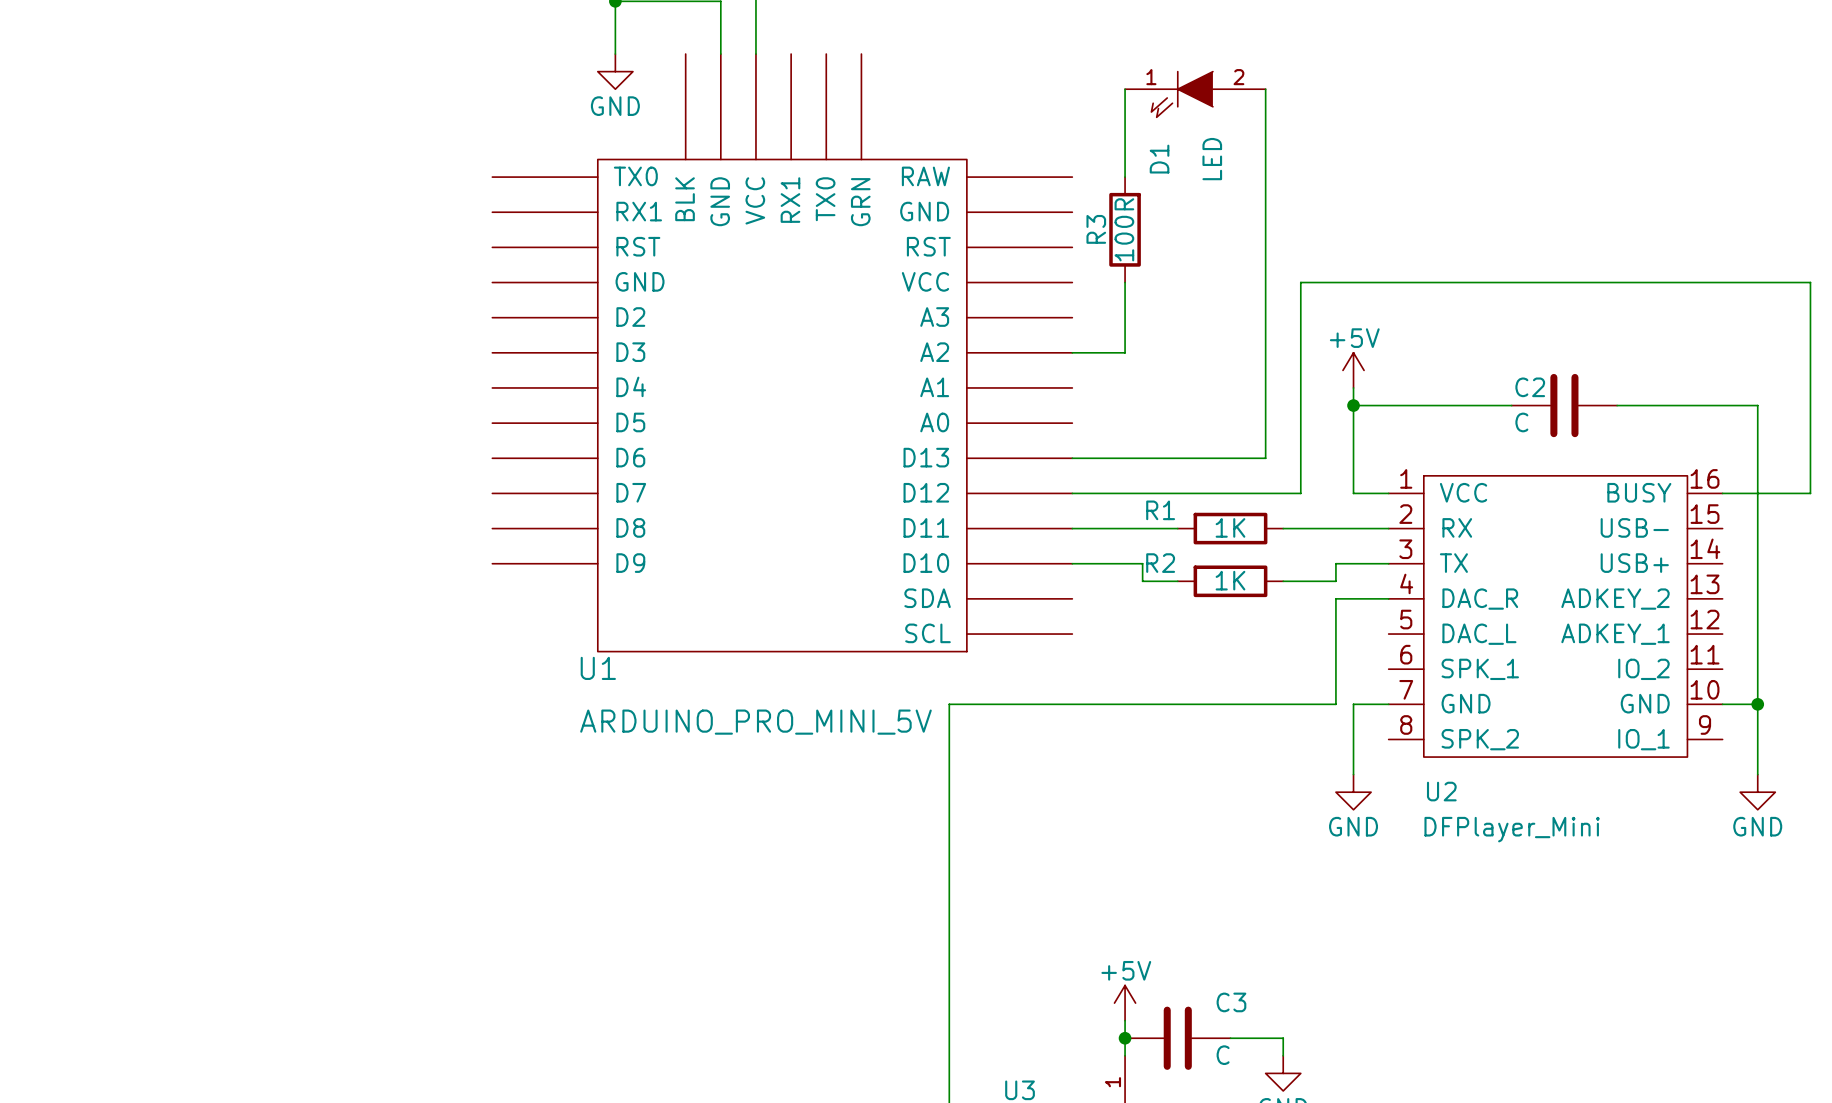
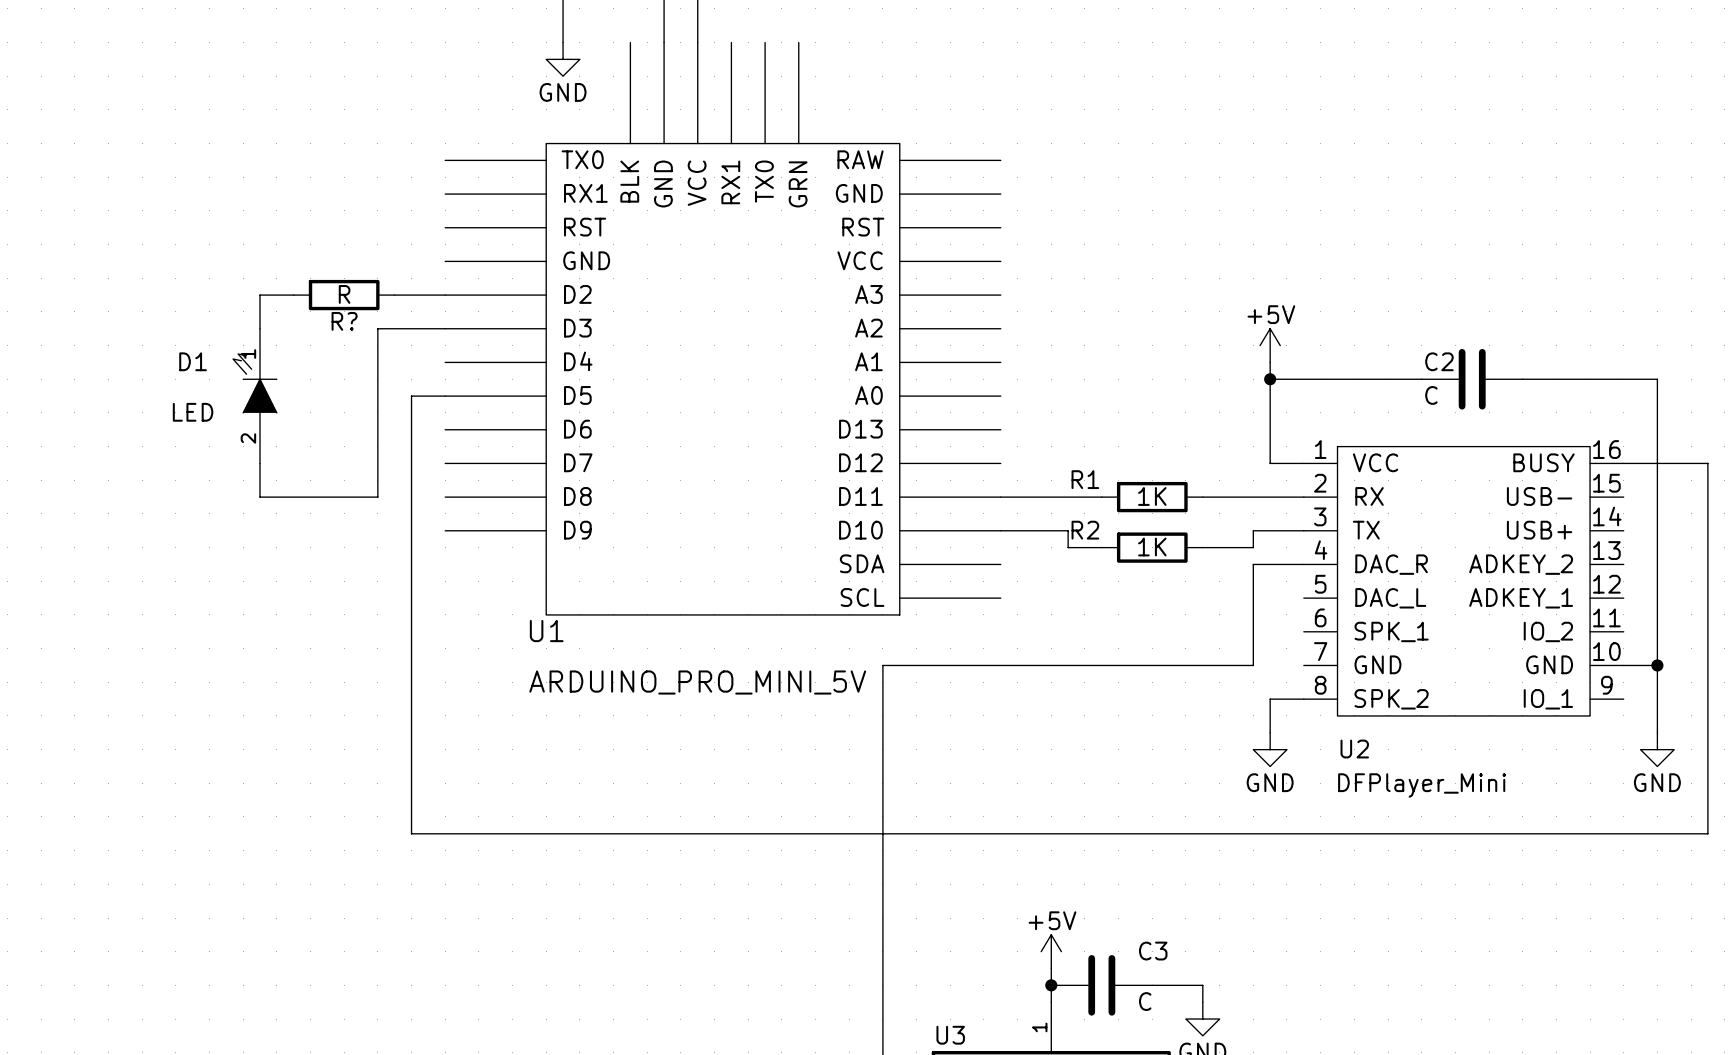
wire: (1125, 89) (1125, 177) -> none
wire: (1265, 89) (1265, 458) (1072, 458) -> none
D1 rotation: 0° (1182, 94) -> 90° clockwise (254, 383)
D1 position: (1195, 94) -> (254, 396)
R3: 100R (1125, 229) -> none
wire: (1125, 282) (1125, 352) (1072, 352) -> none
wire: none -> (293, 295) (260, 295) (260, 328)
R?: none -> R (344, 295)
wire: none -> (394, 295) (445, 295)
wire: none -> (445, 328) (377, 328) (377, 497) (260, 497) (260, 463)
wire: (1072, 493) (1300, 493) (1300, 282) (1810, 282) (1810, 493) -> (445, 396) (411, 396) (411, 833) (1707, 833) (1707, 463)
wire: (1388, 704) (1353, 704) (1353, 739) -> (1303, 699) (1270, 699)

